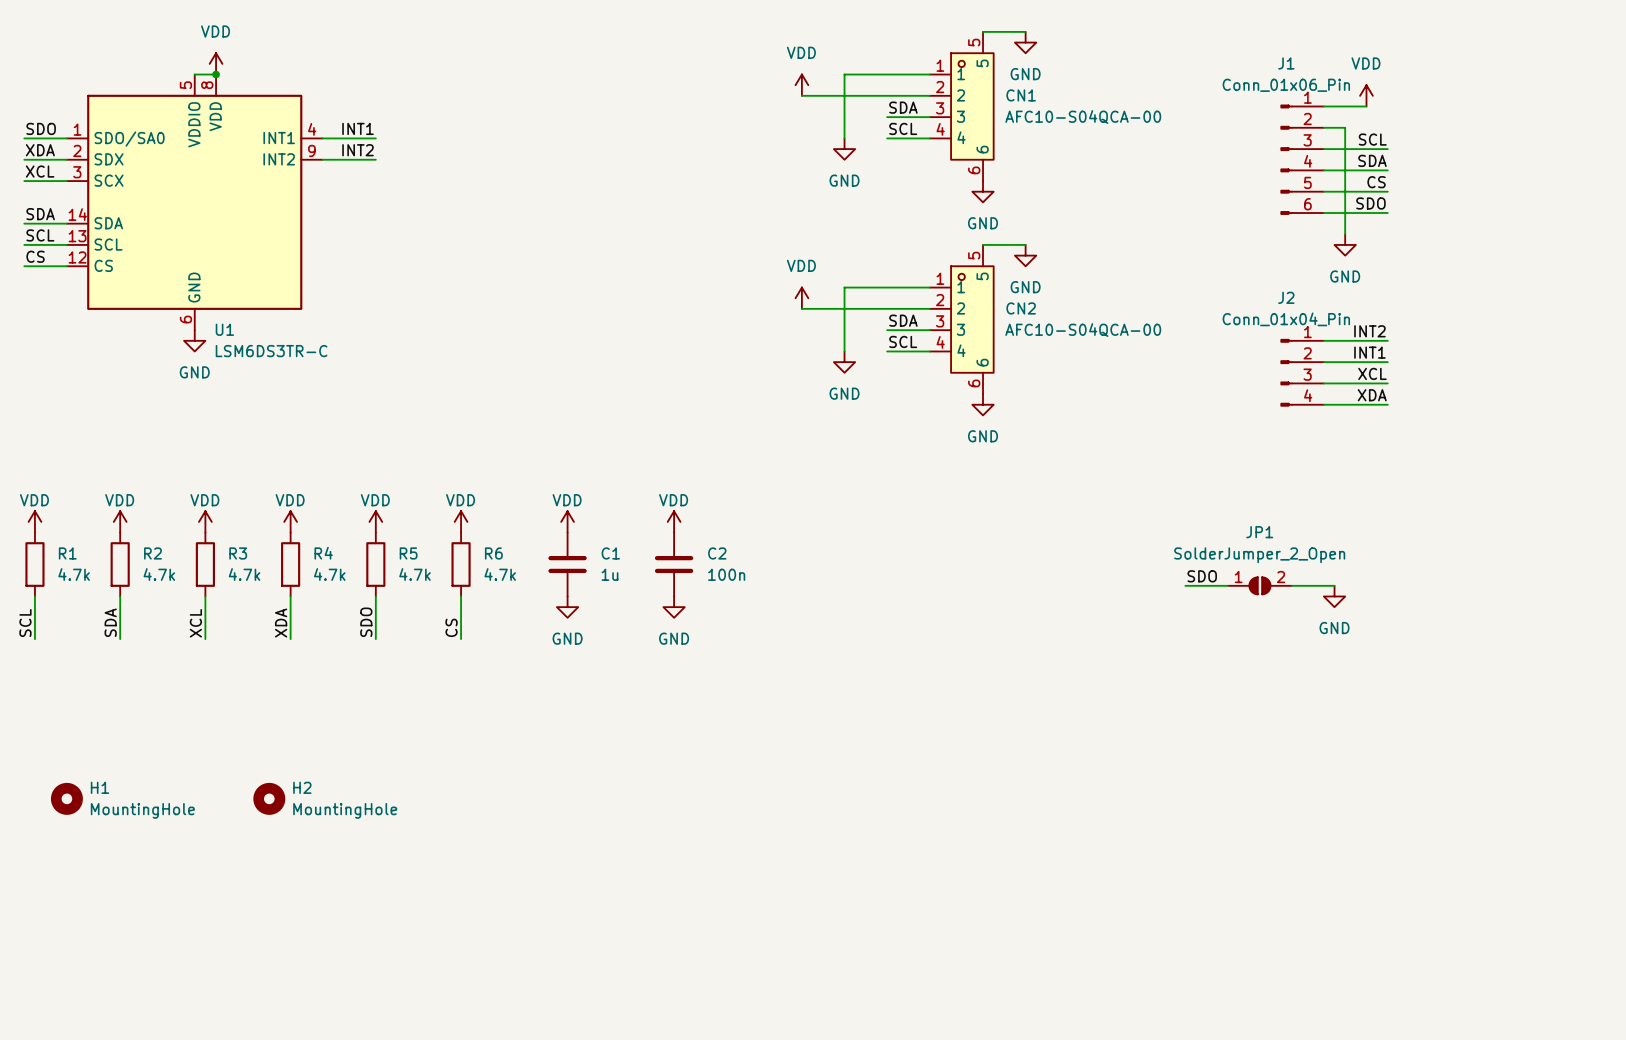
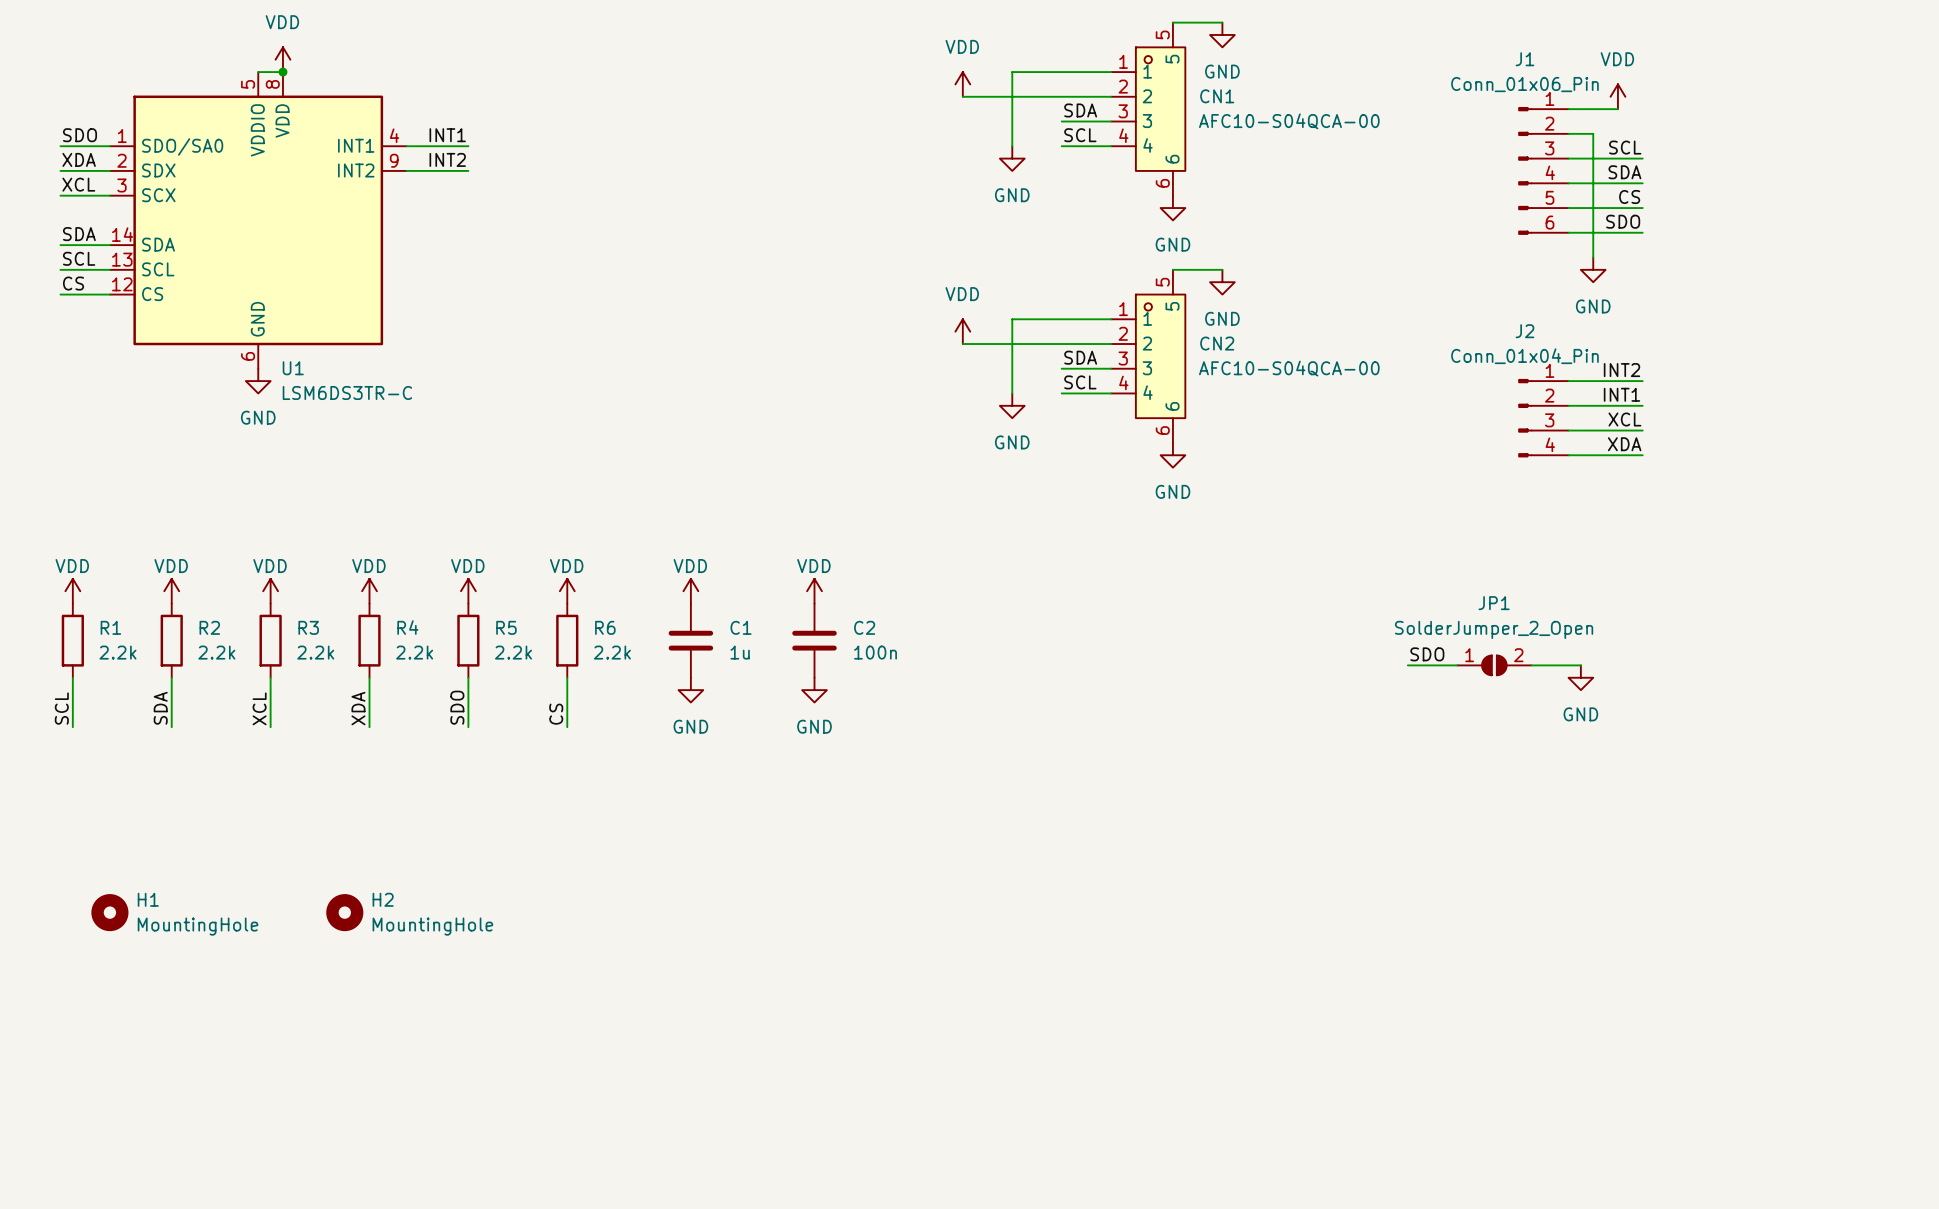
R1 value: 4.7k (74, 574) -> 2.2k (117, 652)
R2 value: 4.7k (159, 574) -> 2.2k (216, 652)
R3 value: 4.7k (244, 574) -> 2.2k (315, 652)
R4 value: 4.7k (329, 574) -> 2.2k (414, 652)
R5 value: 4.7k (414, 574) -> 2.2k (513, 652)
R6 value: 4.7k (500, 574) -> 2.2k (612, 652)

